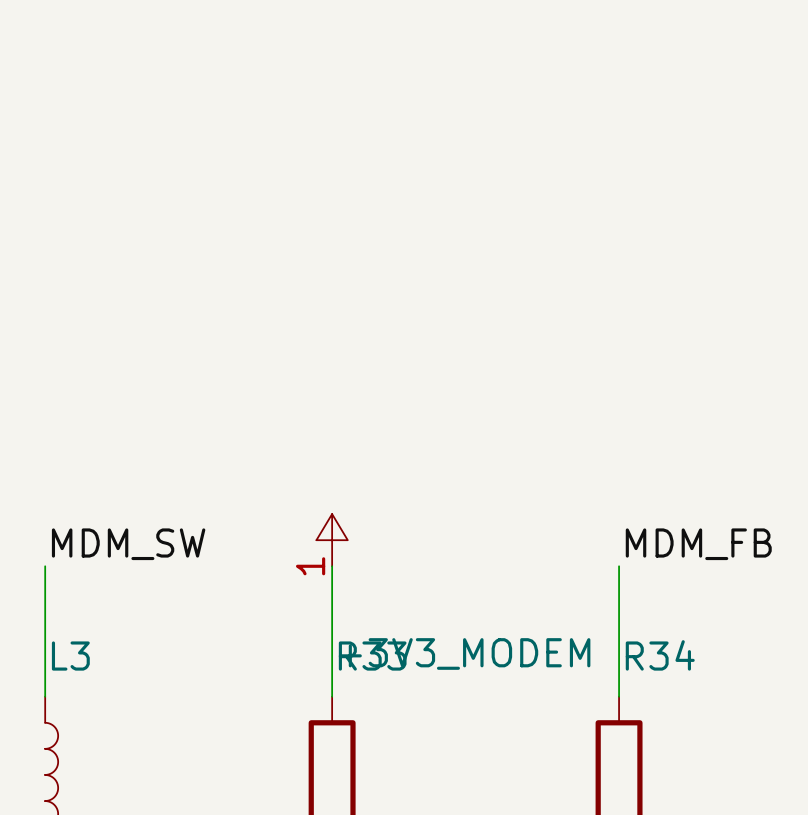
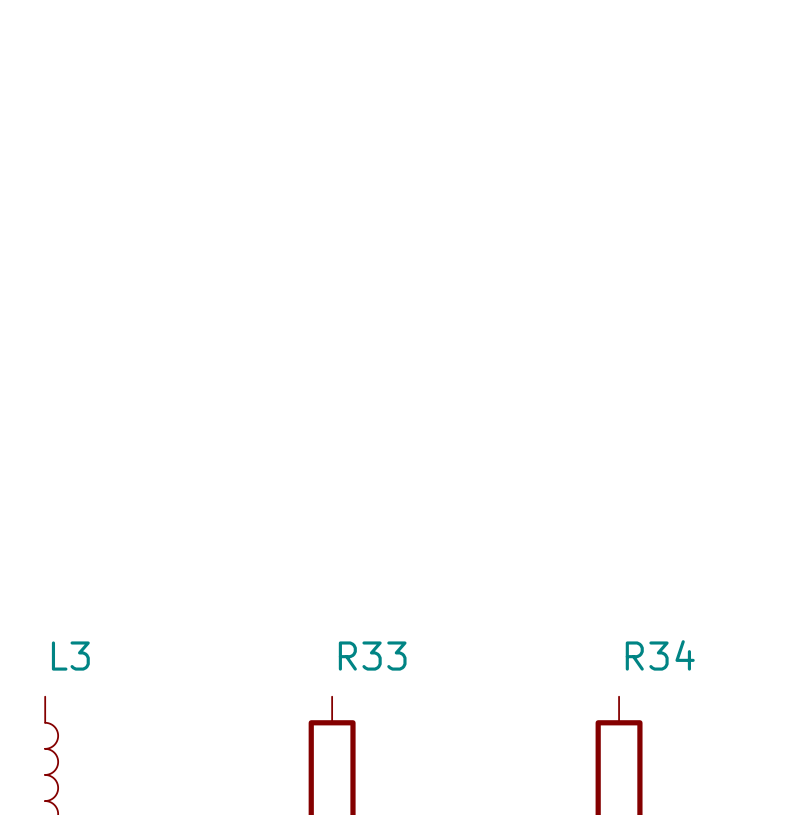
power symbol: +3V3_MODEM (332, 540) -> none
label: MDM_SW (128, 544) -> none
label: MDM_FB (698, 544) -> none
wire: (45, 566) (45, 696) -> none
wire: (332, 566) (332, 696) -> none
wire: (619, 566) (619, 696) -> none

